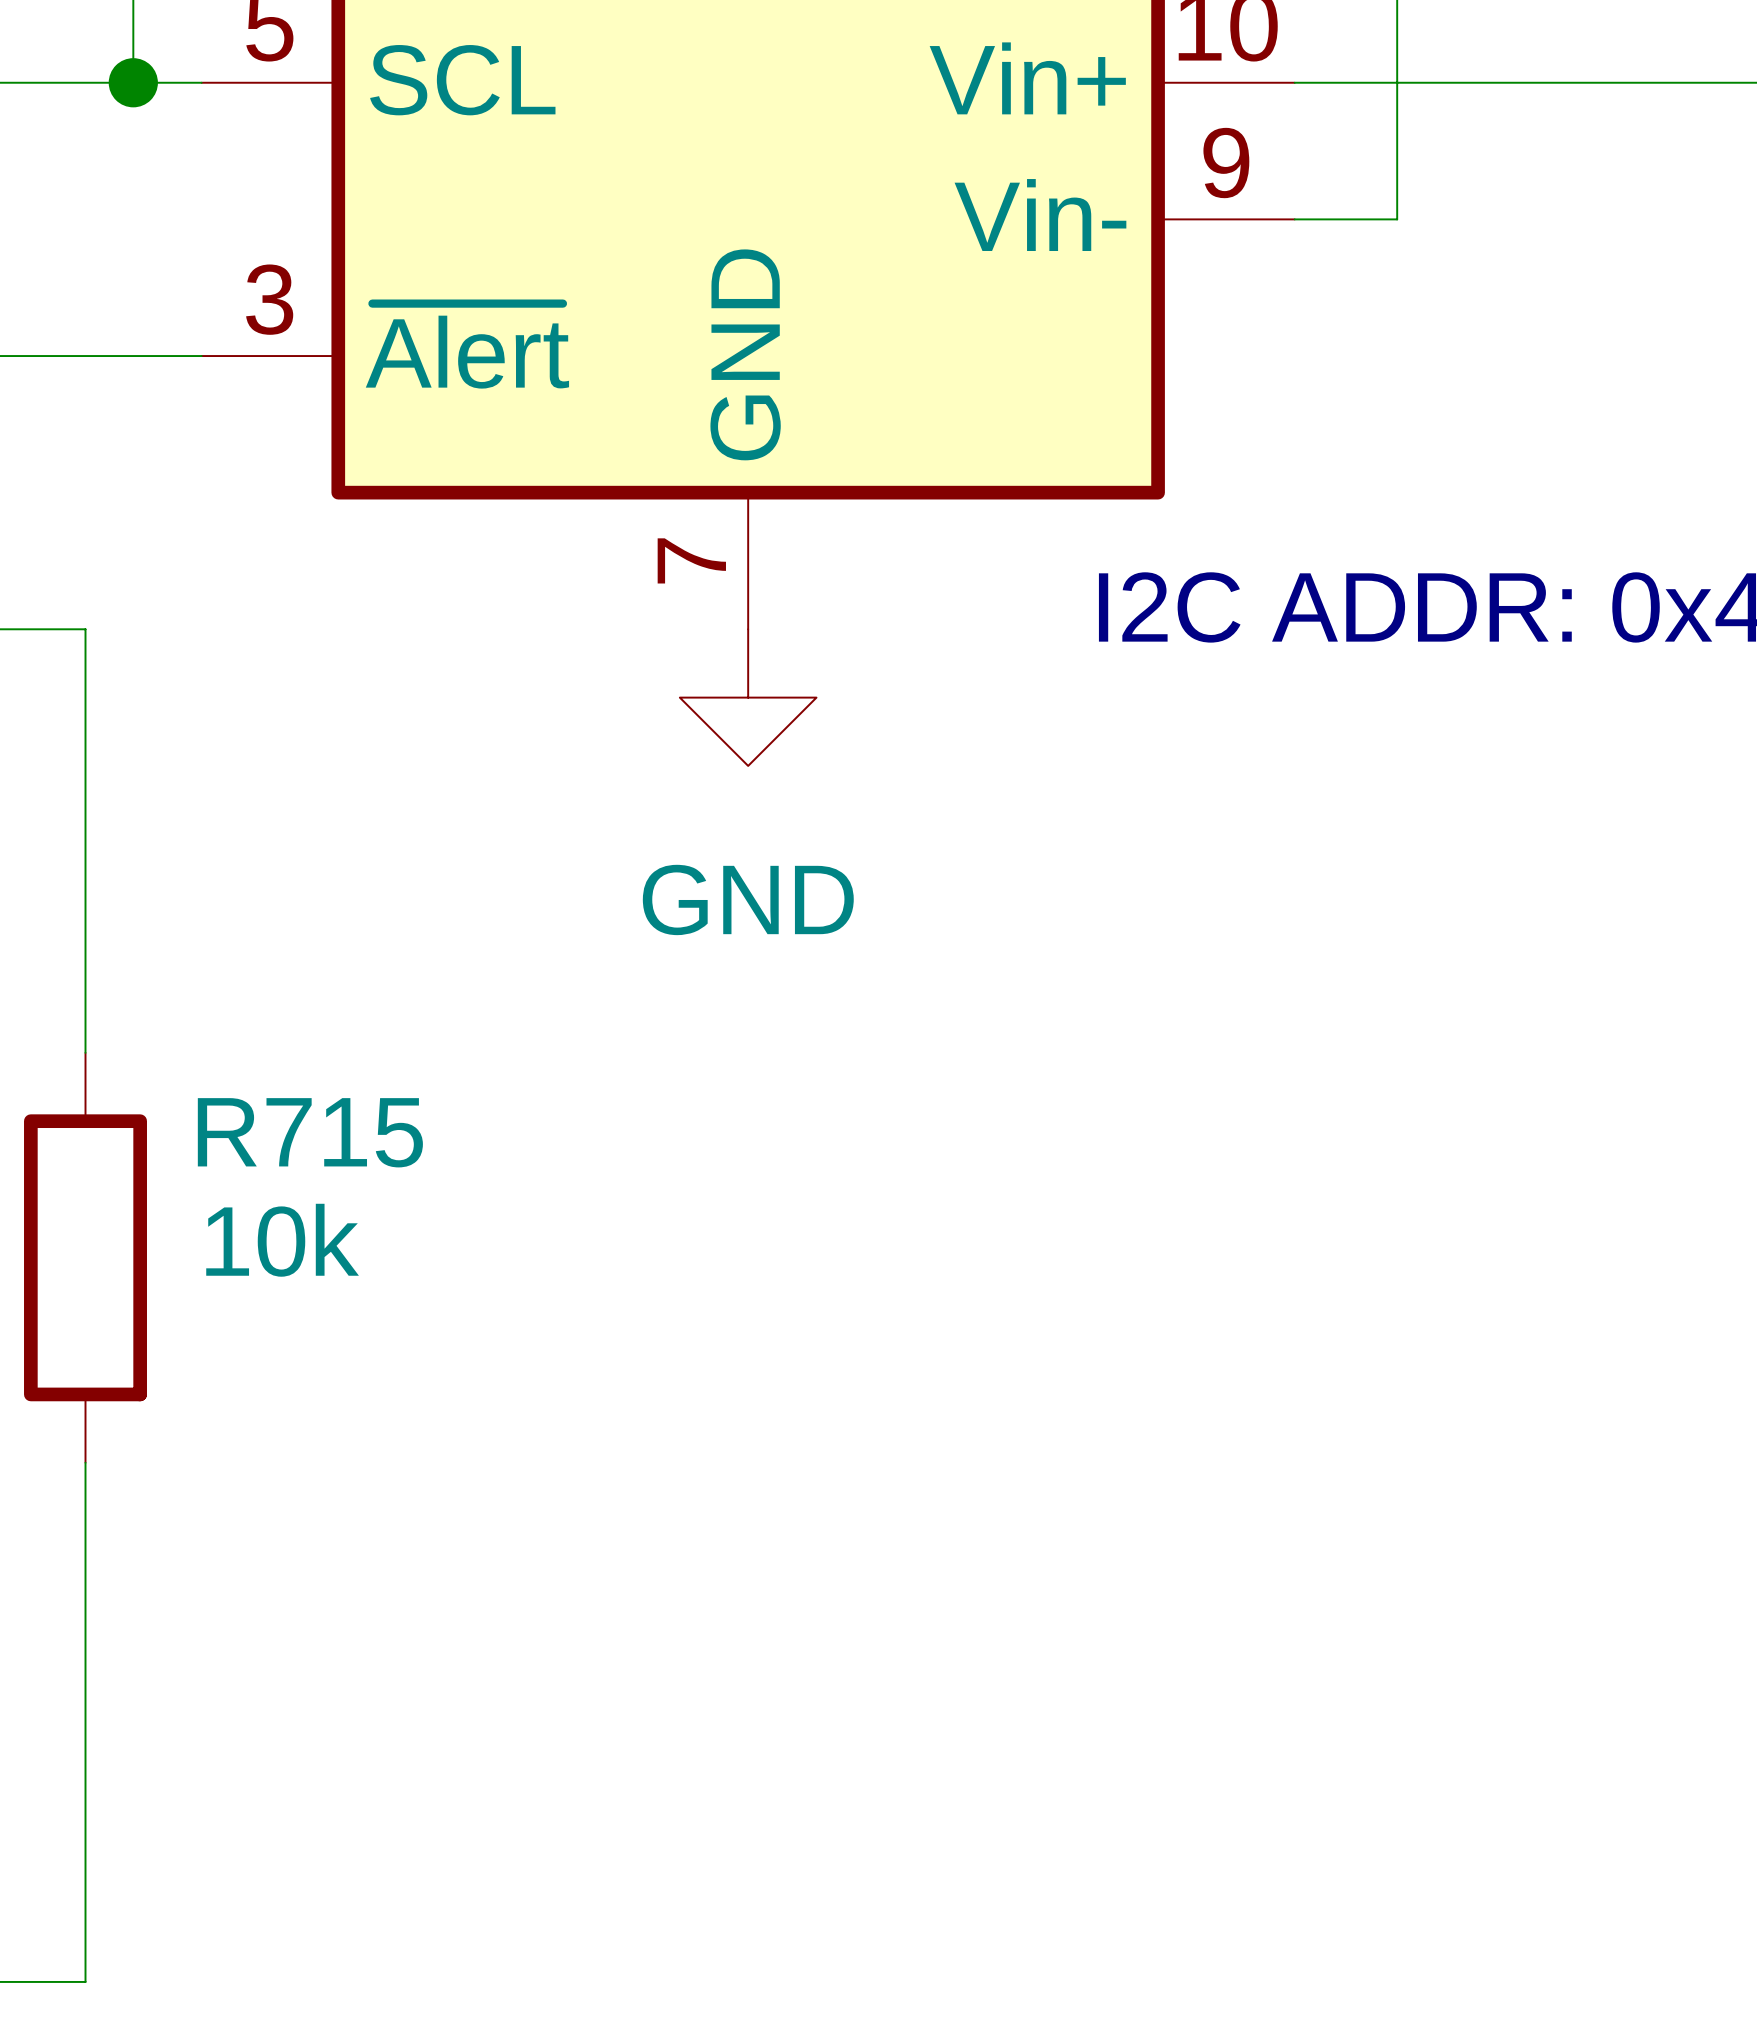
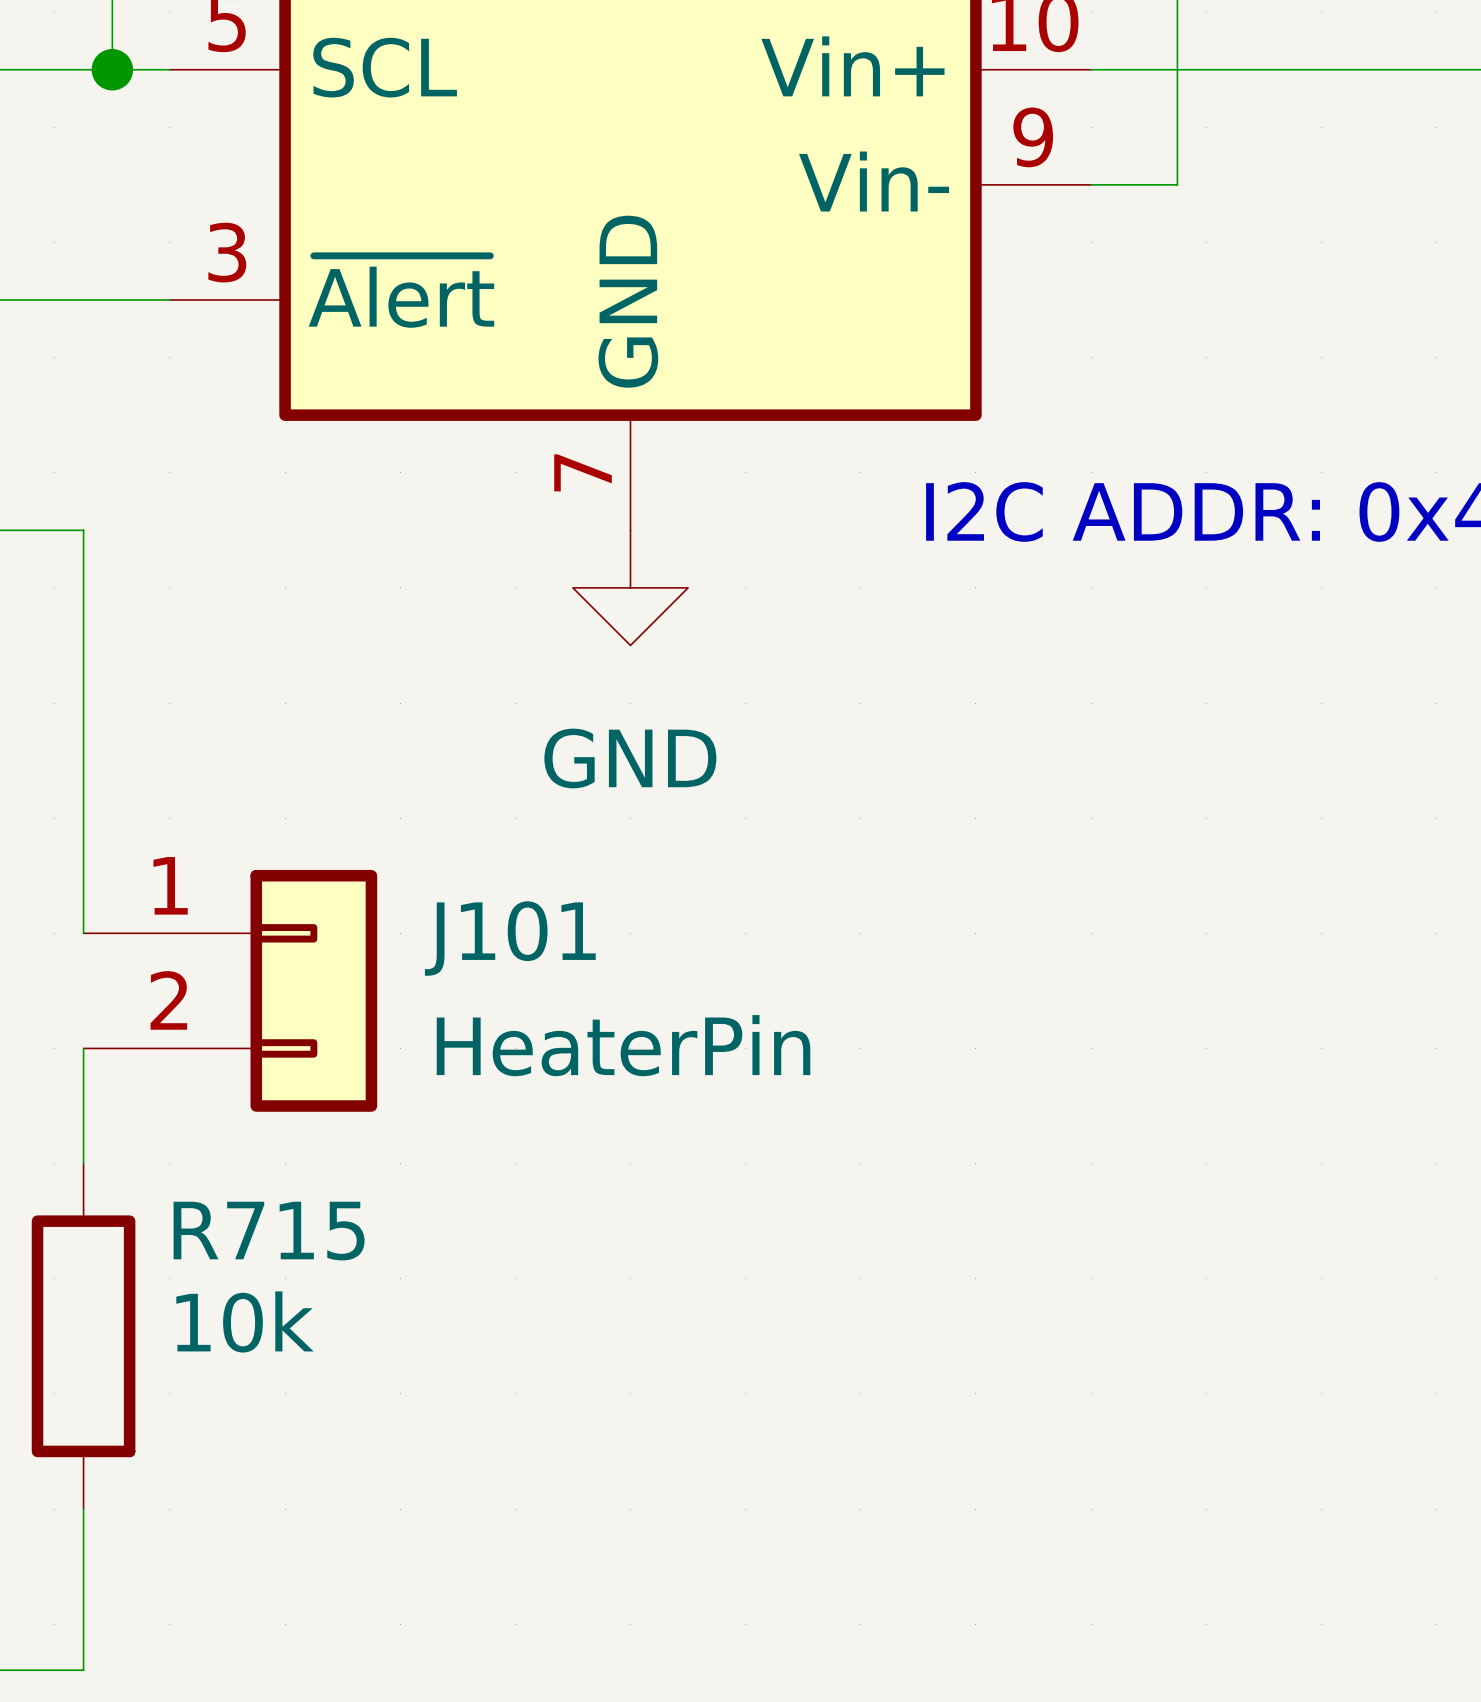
wire: (85, 629) (85, 1052) -> (72, 530) (83, 530) (83, 933)
J101: none -> HeaterPin (230, 990)
wire: none -> (83, 1048) (83, 1163)
R715 position: (85, 1257) -> (83, 1336)
wire: (85, 1462) (85, 1981) -> (83, 1509) (83, 1670) (72, 1670)

